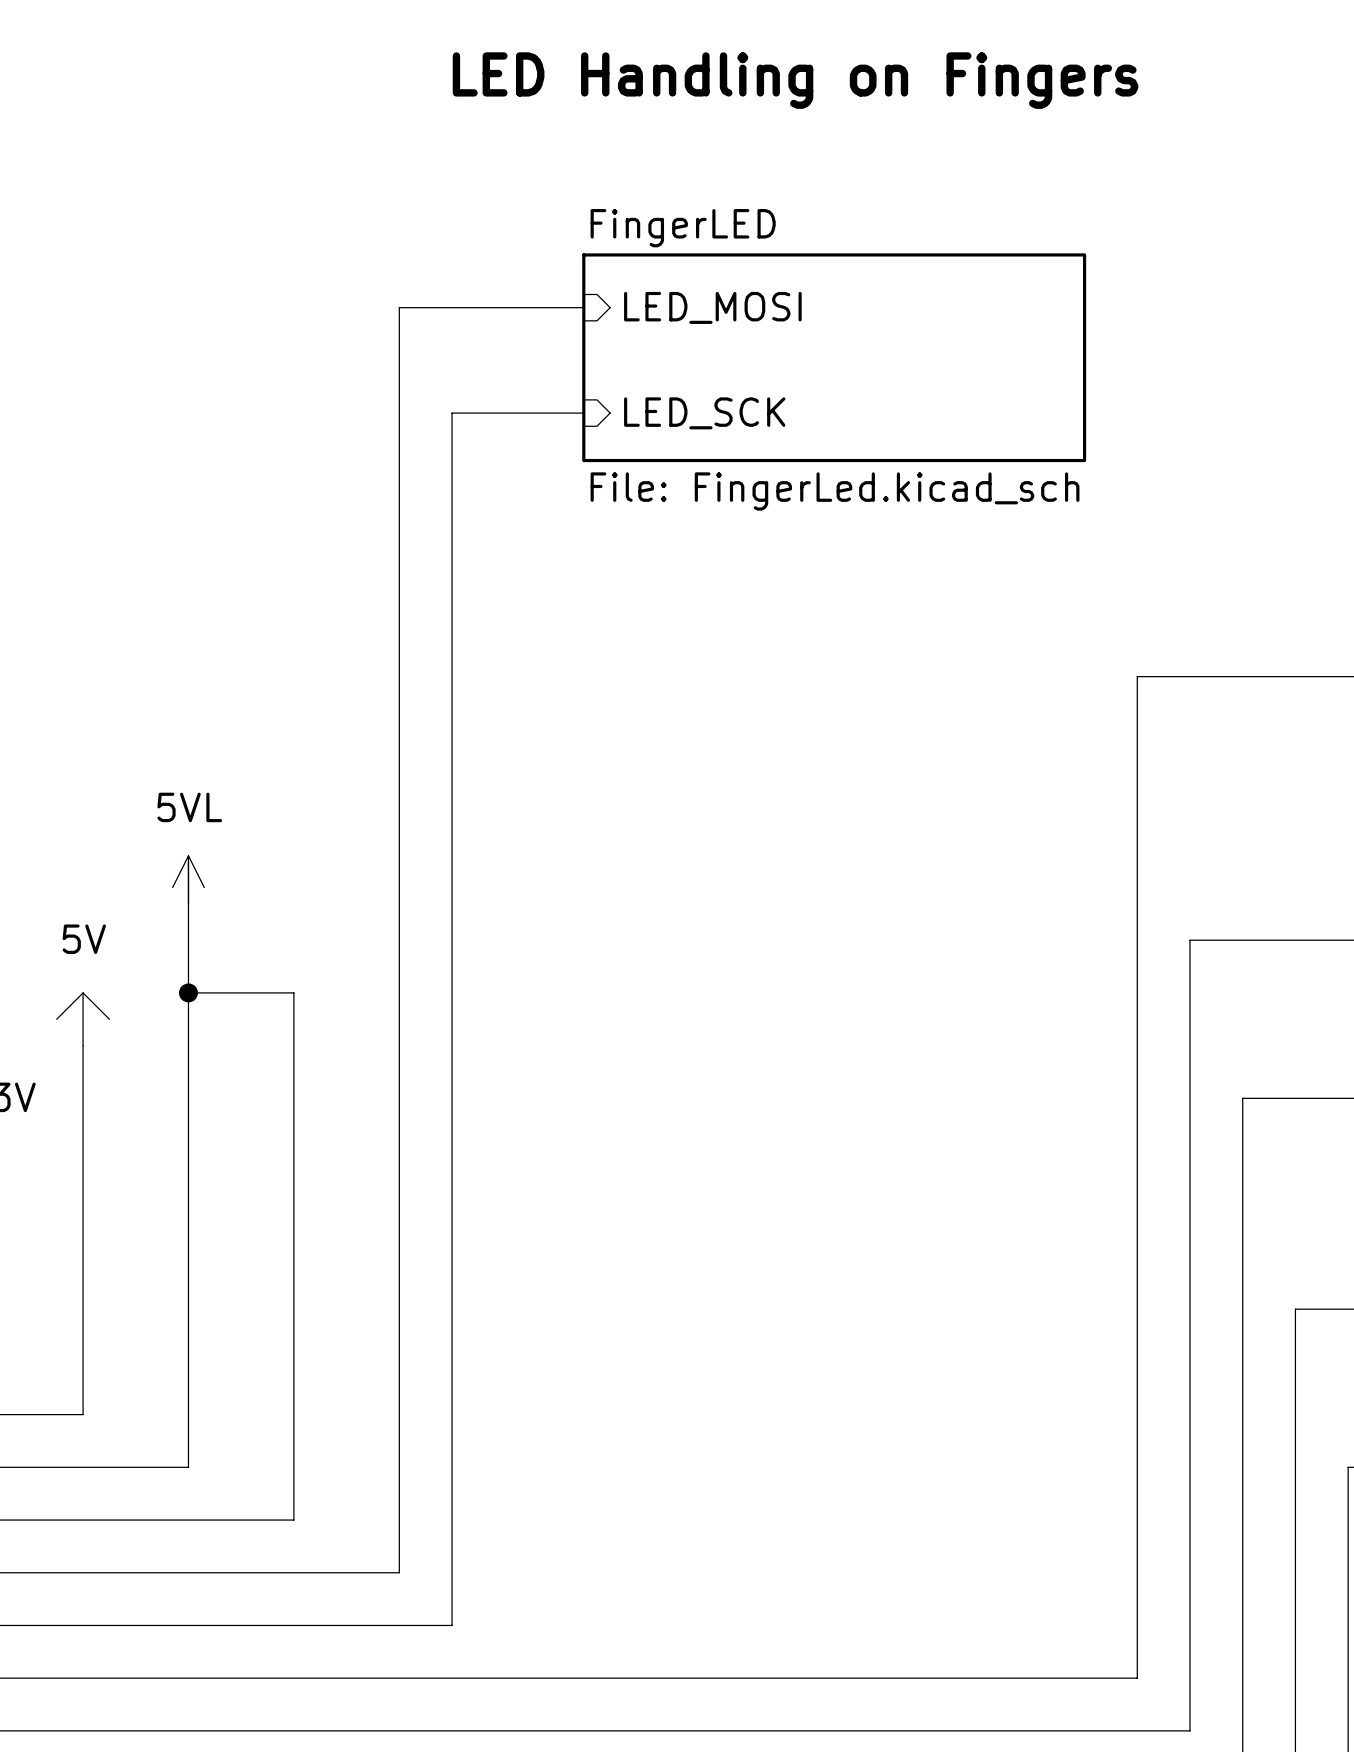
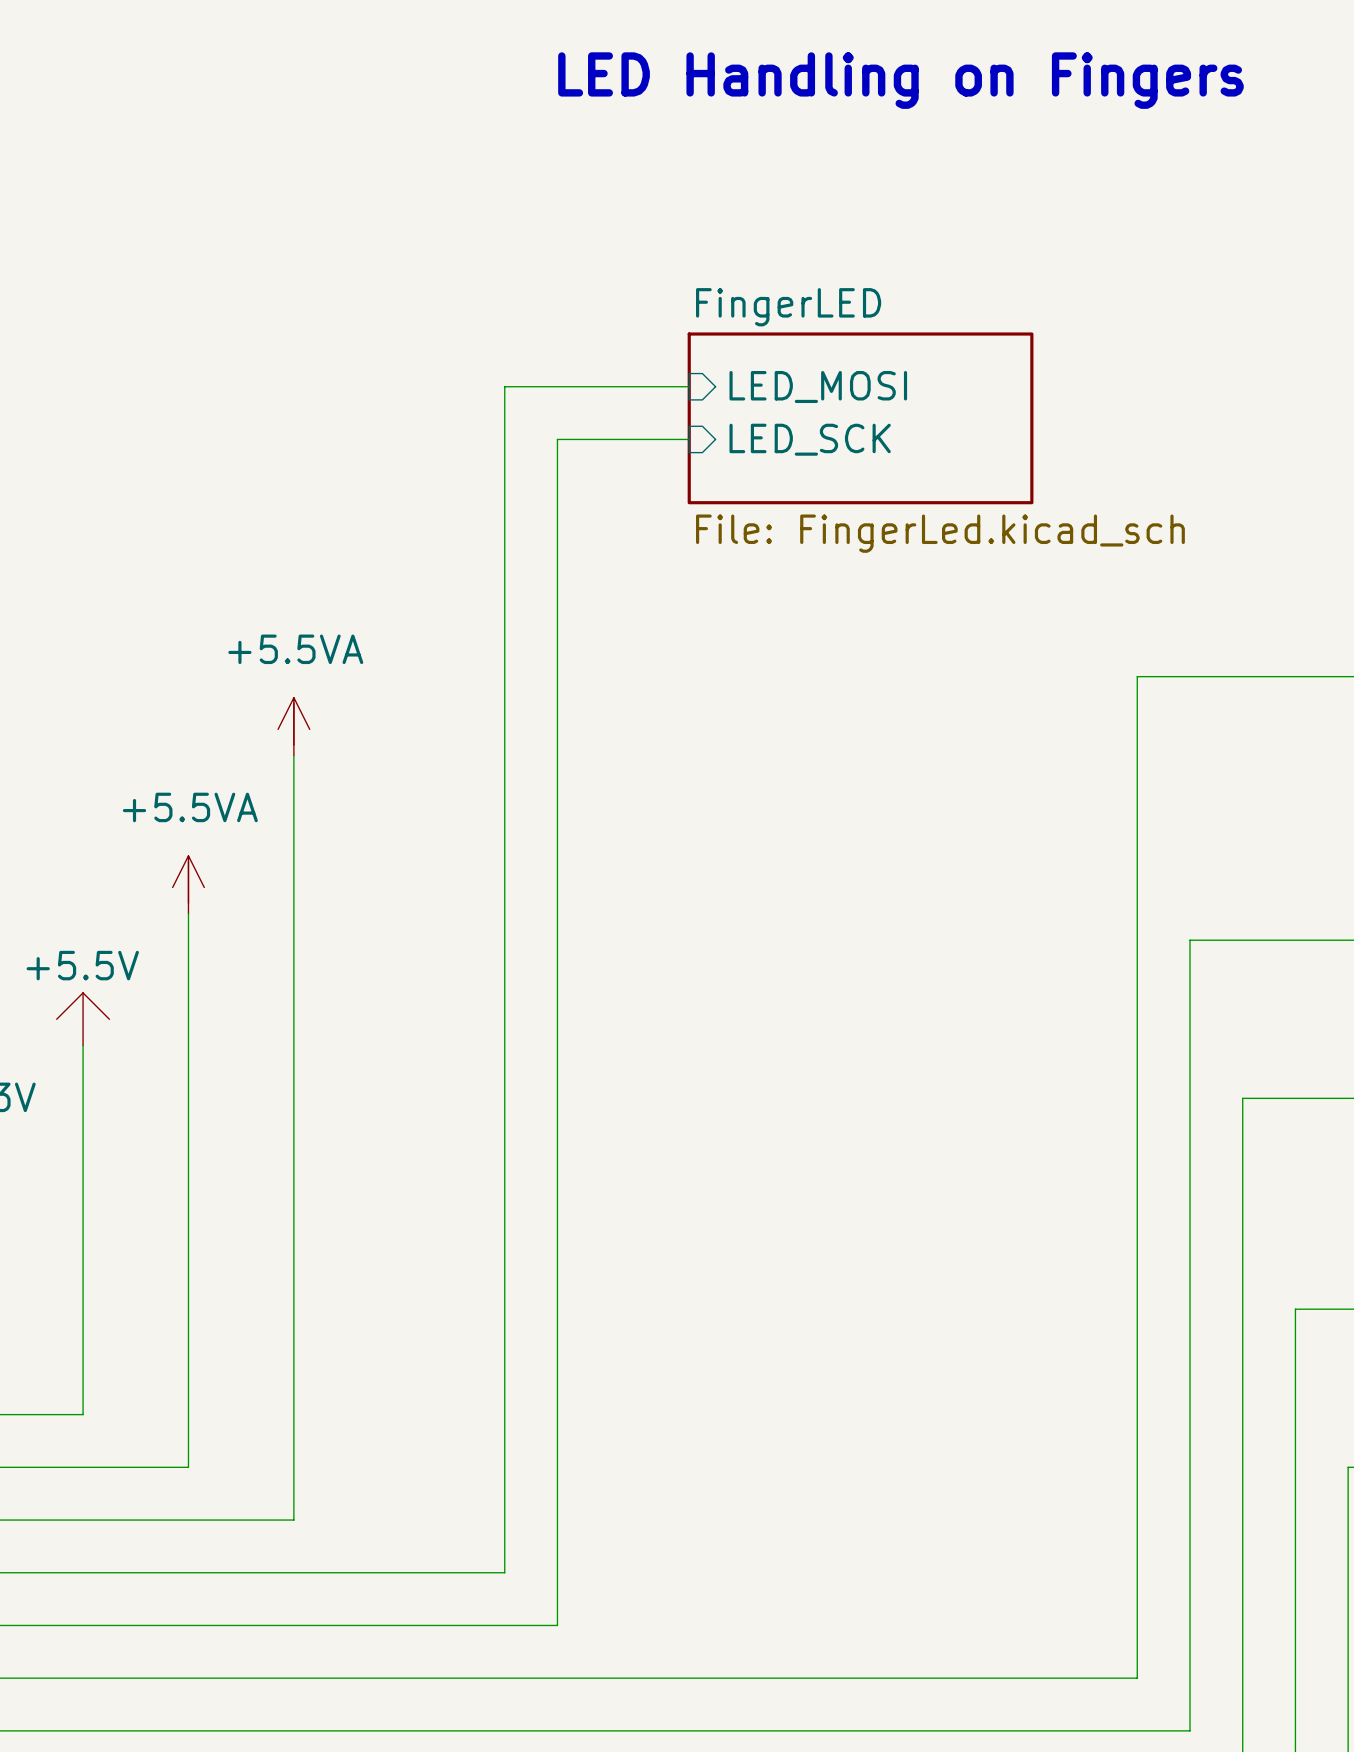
text position: LED Handling on Fingers (795, 80) -> LED Handling on Fingers (900, 80)
wire: (583, 307) (399, 307) (399, 1572) -> (689, 386) (504, 386) (504, 1572) (399, 1572)
sheet pin position: LED_MOSI (712, 307) -> LED_MOSI (818, 387)
sheet FingerLED: File: FingerLed.kicad_sch (834, 357) -> none
wire: (583, 413) (452, 413) (452, 1625) -> (689, 439) (557, 439) (557, 1625) (452, 1625)
sheet pin position: LED_SCK (704, 413) -> LED_SCK (810, 439)
sheet FingerLED: none -> File: FingerLed.kicad_sch (860, 418)
power symbol: none -> +5.5VA (293, 726)
power symbol: 5VL (188, 884) -> +5.5VA (188, 884)
+5.5V text: 5V (84, 939) -> none
+5.5V name: none -> +5.5V (82, 965)
wire: (188, 992) (293, 992) -> (293, 755) (293, 992)
junction: (188, 992) -> none

